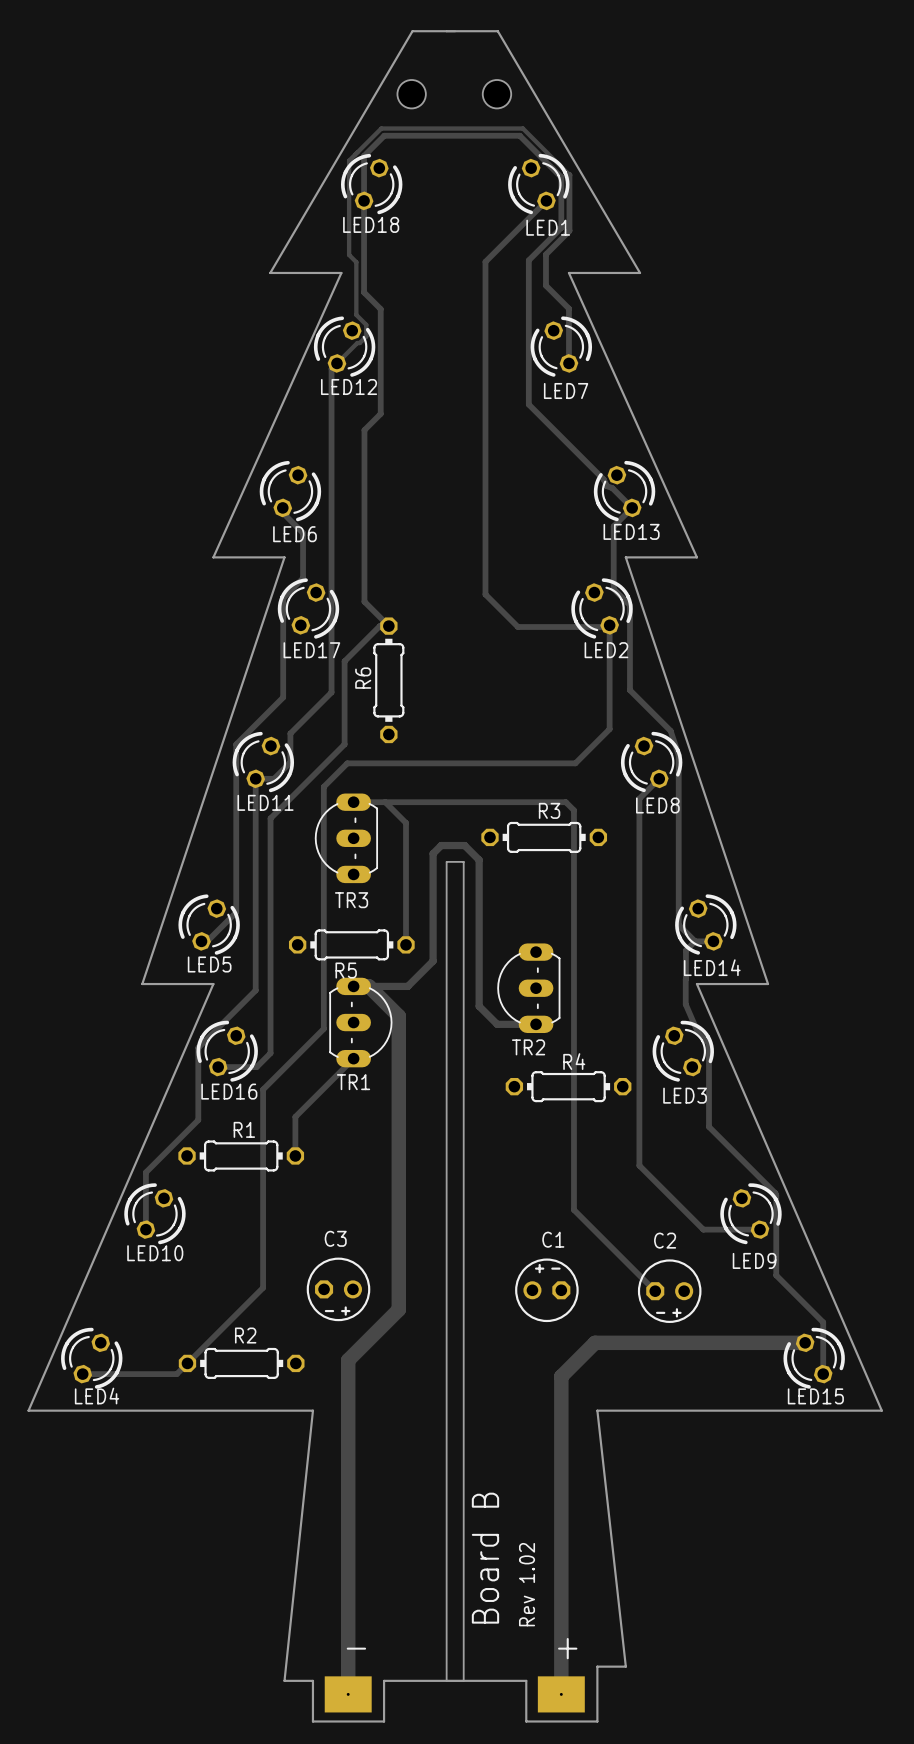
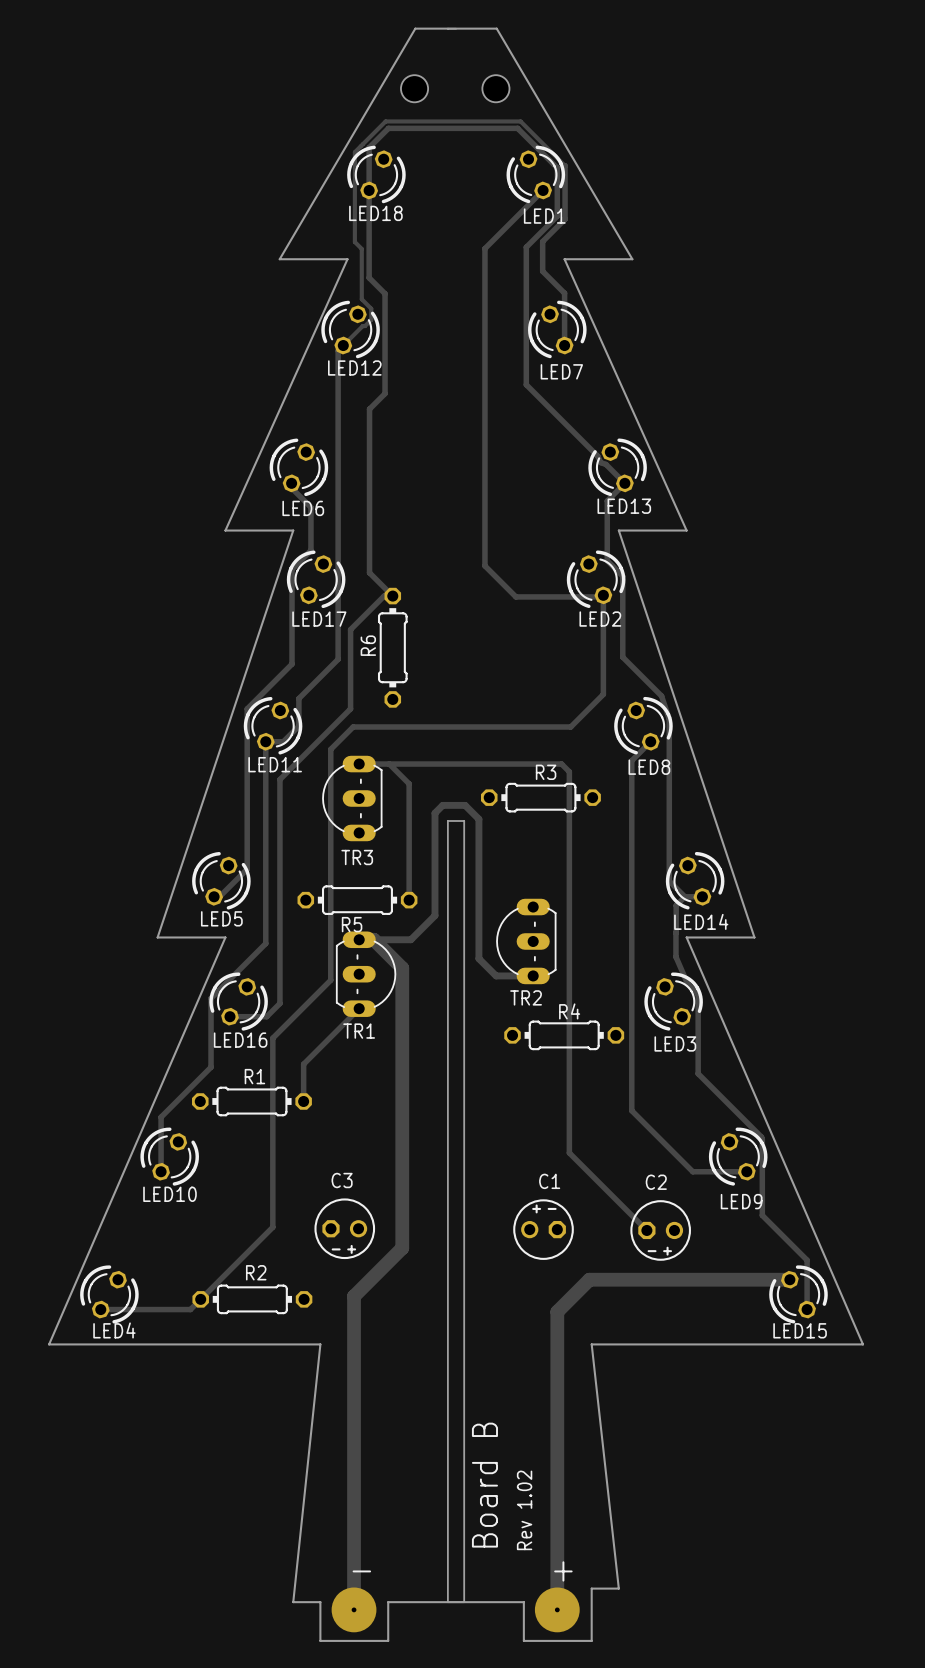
via: none -> (354, 1609)
via: none -> (557, 1609)
part: (348, 1694) -> none
part: (561, 1694) -> none

